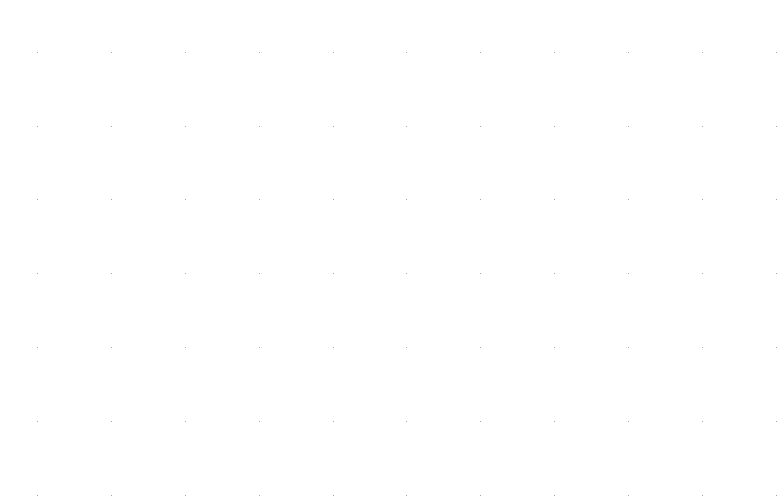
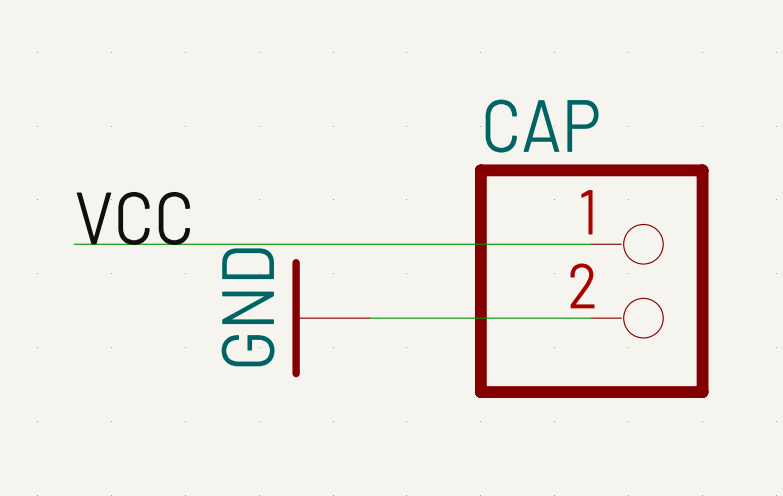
label: none -> VCC (133, 218)
wire: none -> (74, 244) (591, 244)
CAP: none -> (591, 281)
power symbol: none -> GND (331, 318)
wire: none -> (370, 318) (591, 318)

